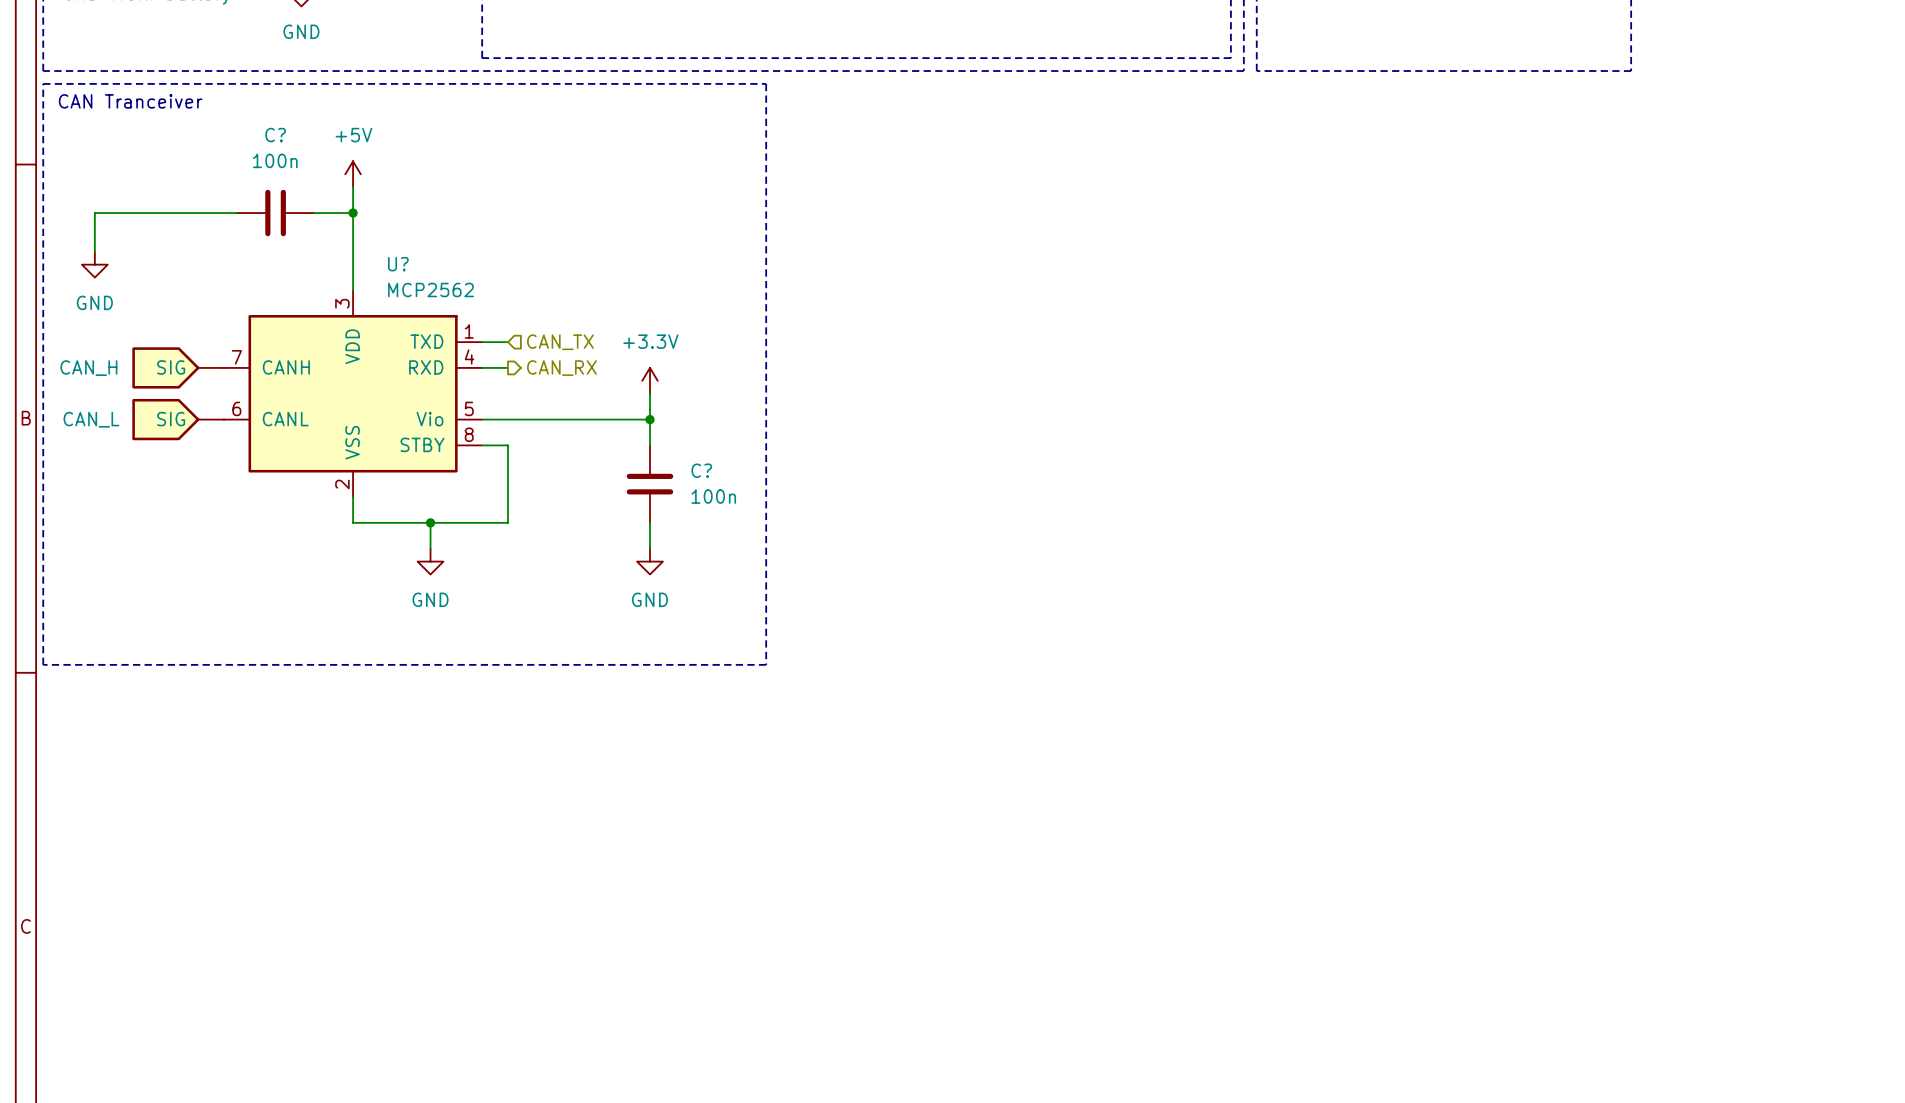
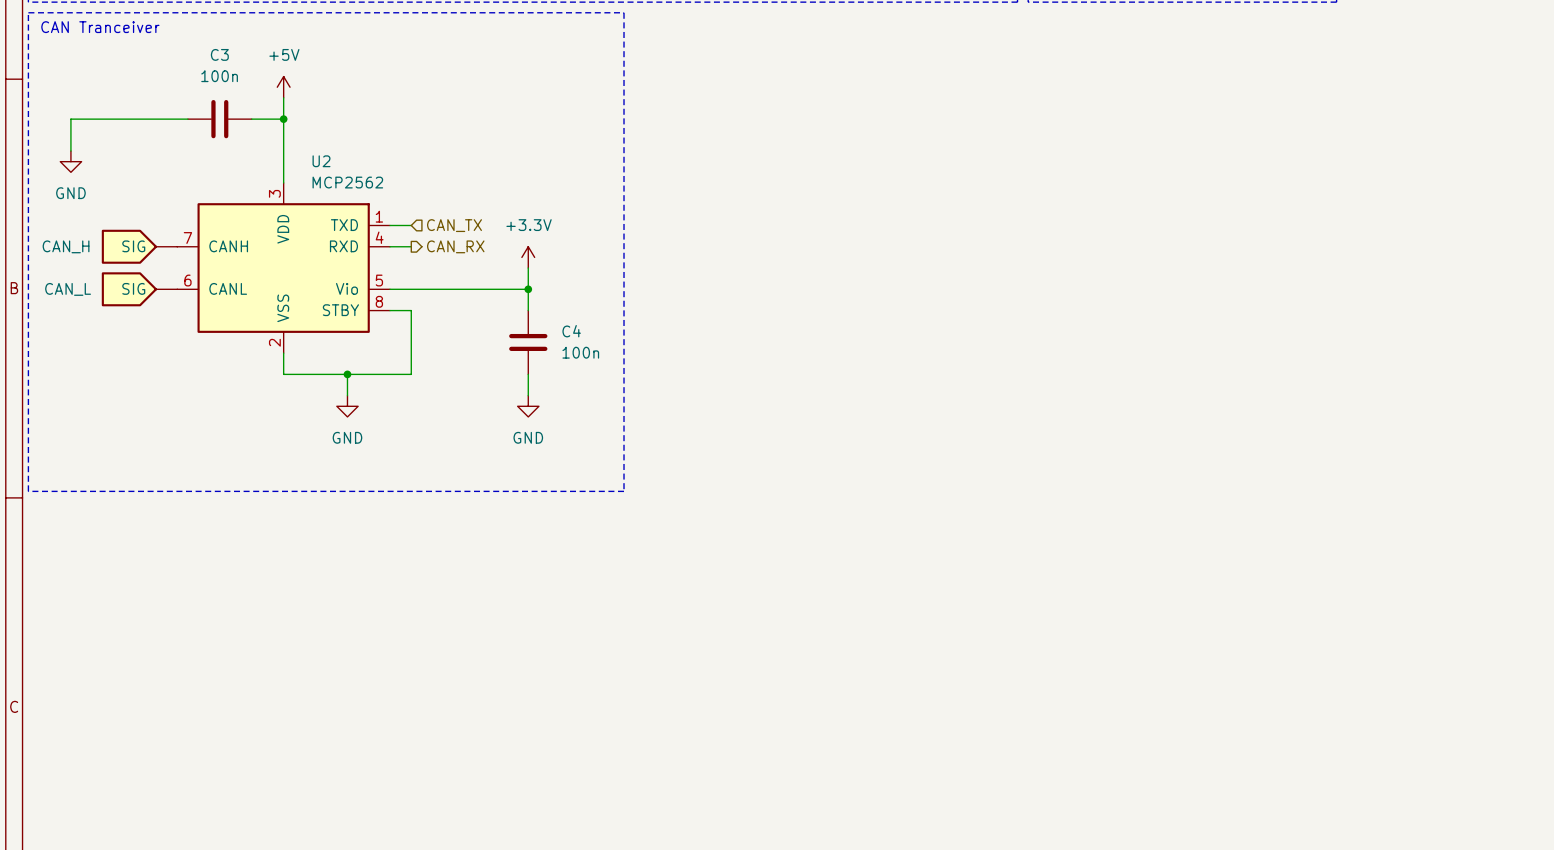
C? name: C? (275, 135) -> C3 (219, 54)
U? name: U? (398, 264) -> U2 (321, 161)
C? name: C? (701, 470) -> C4 (571, 331)

